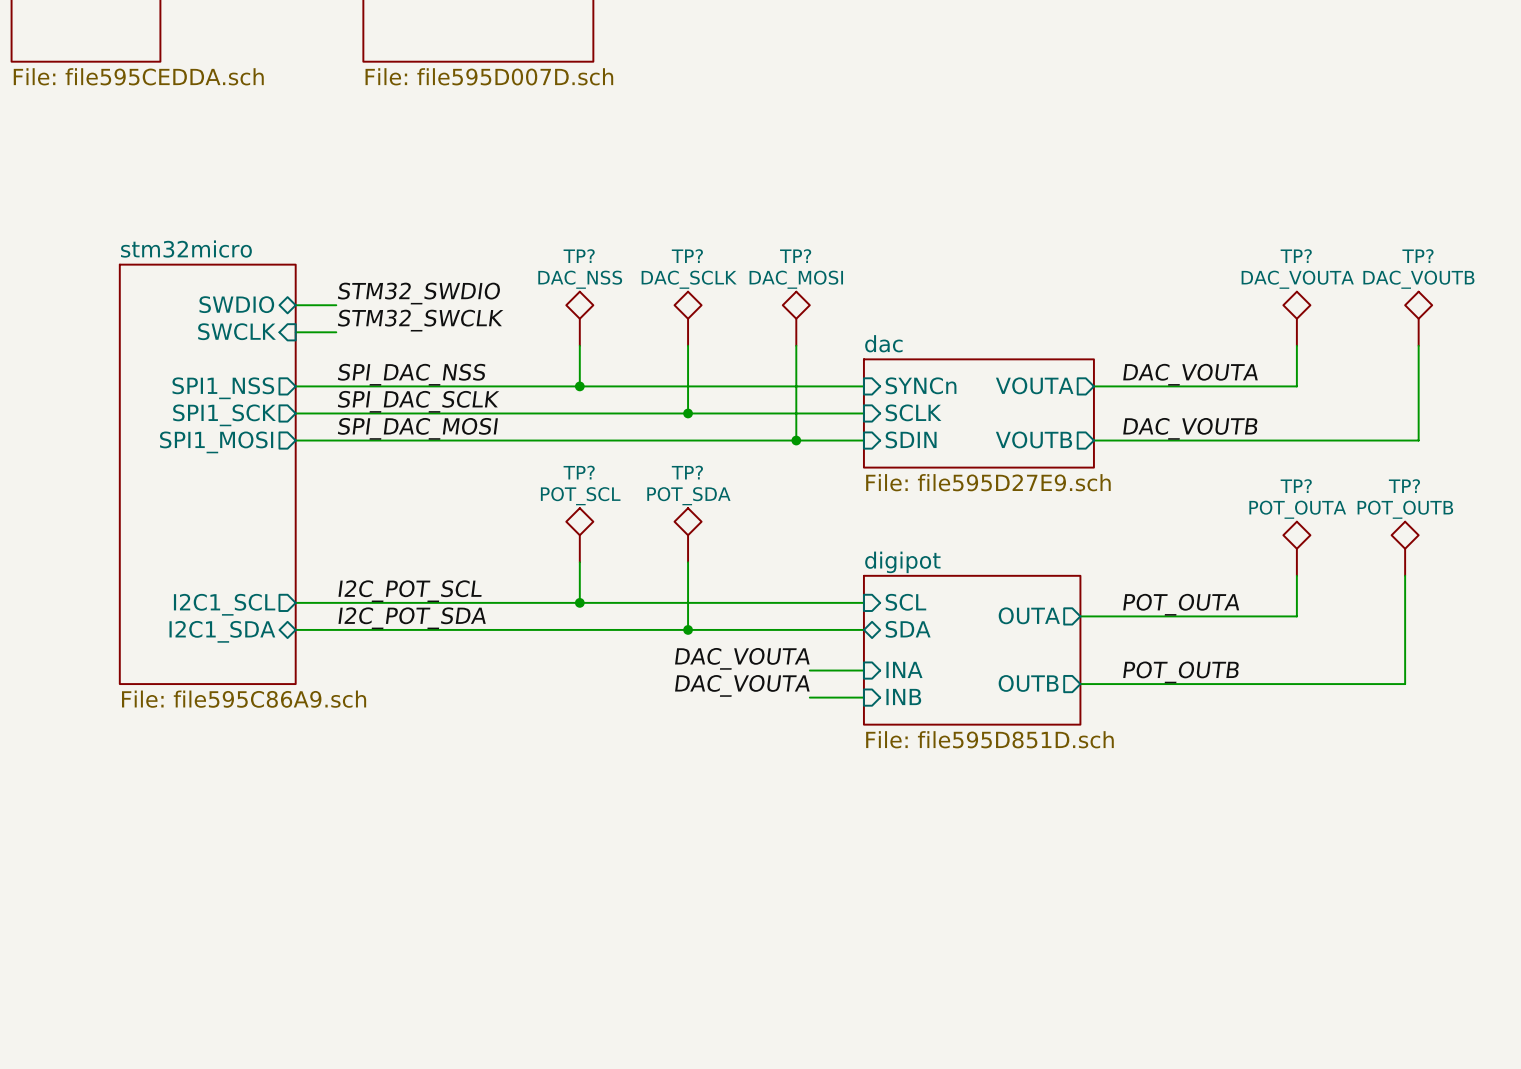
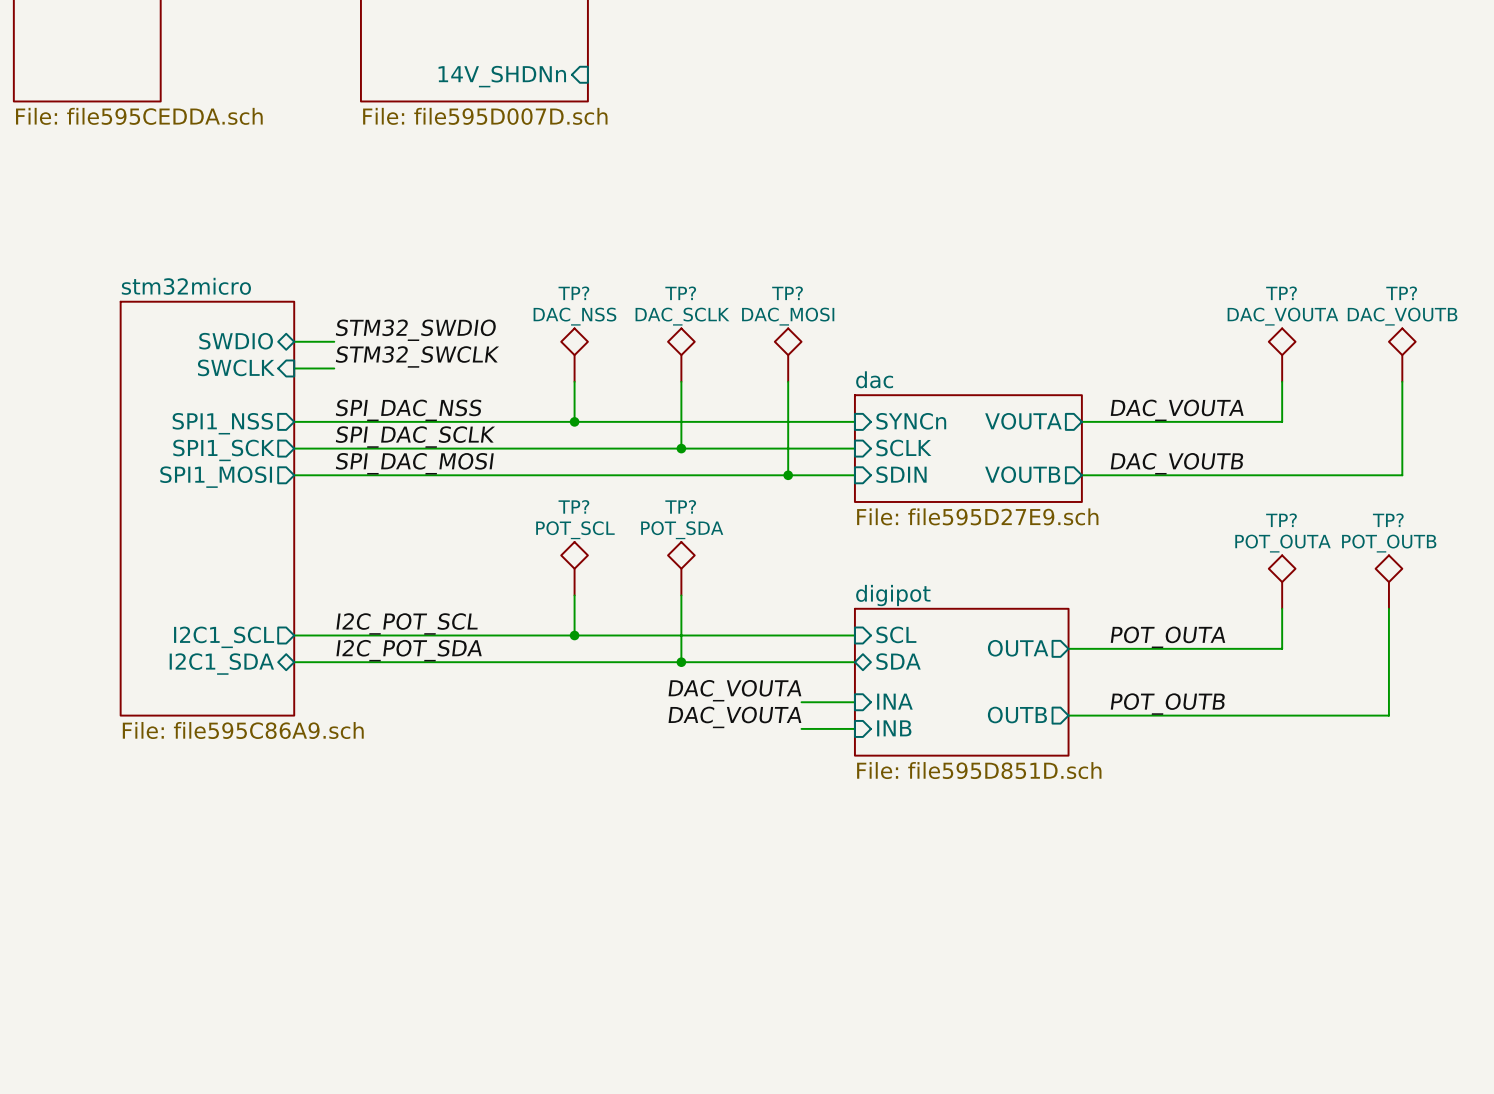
sheet pin: none -> 14V_SHDNn (502, 76)

